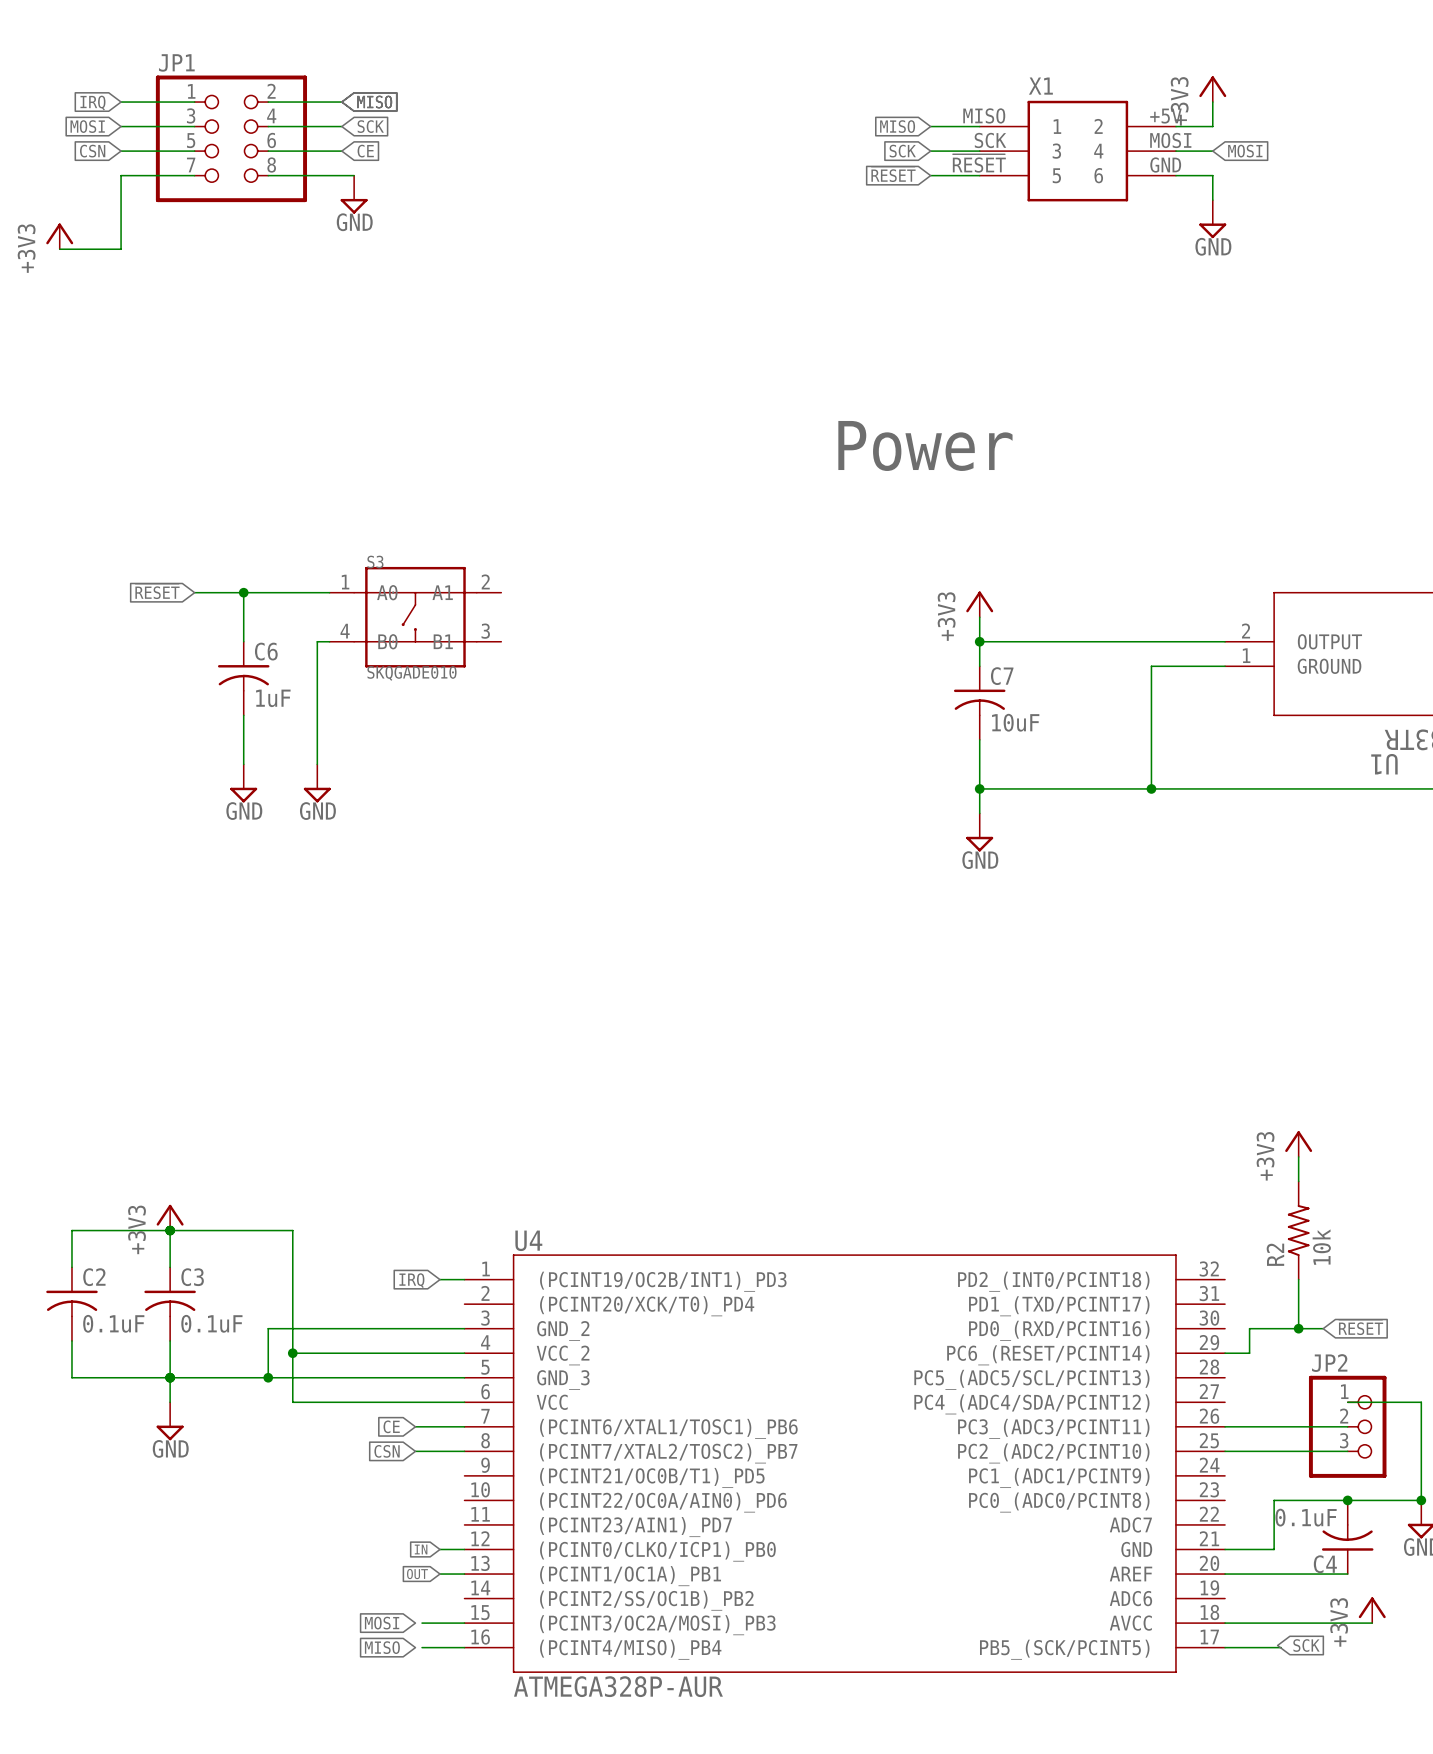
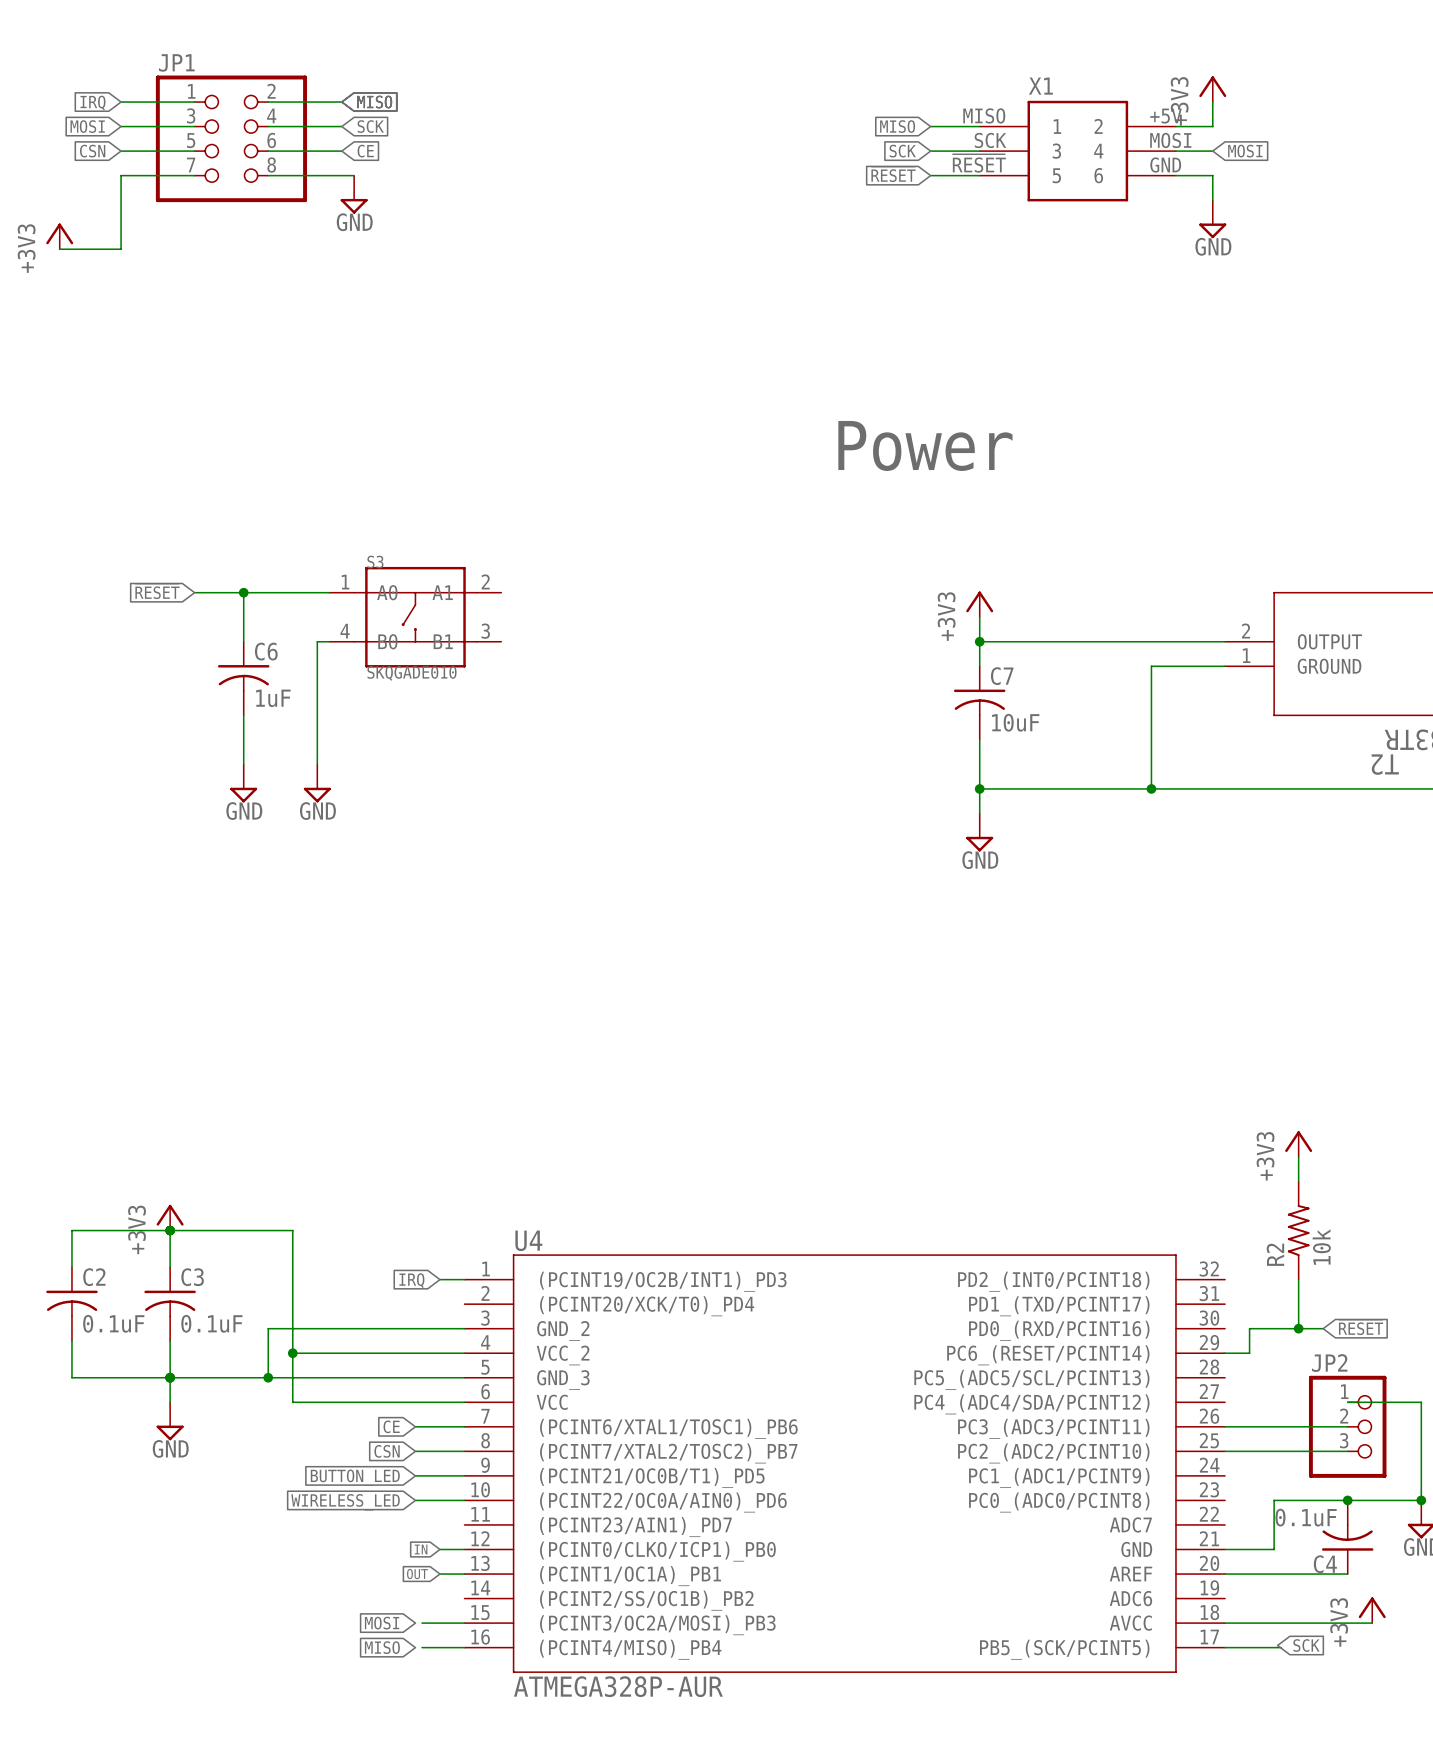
U1 name: U1 (1384, 764) -> T2 (1385, 764)
wire: none -> (415, 1475) (464, 1475)
global label: none -> BUTTON_LED (355, 1477)
wire: none -> (415, 1500) (464, 1500)
global label: none -> WIRELESS_LED (345, 1502)

